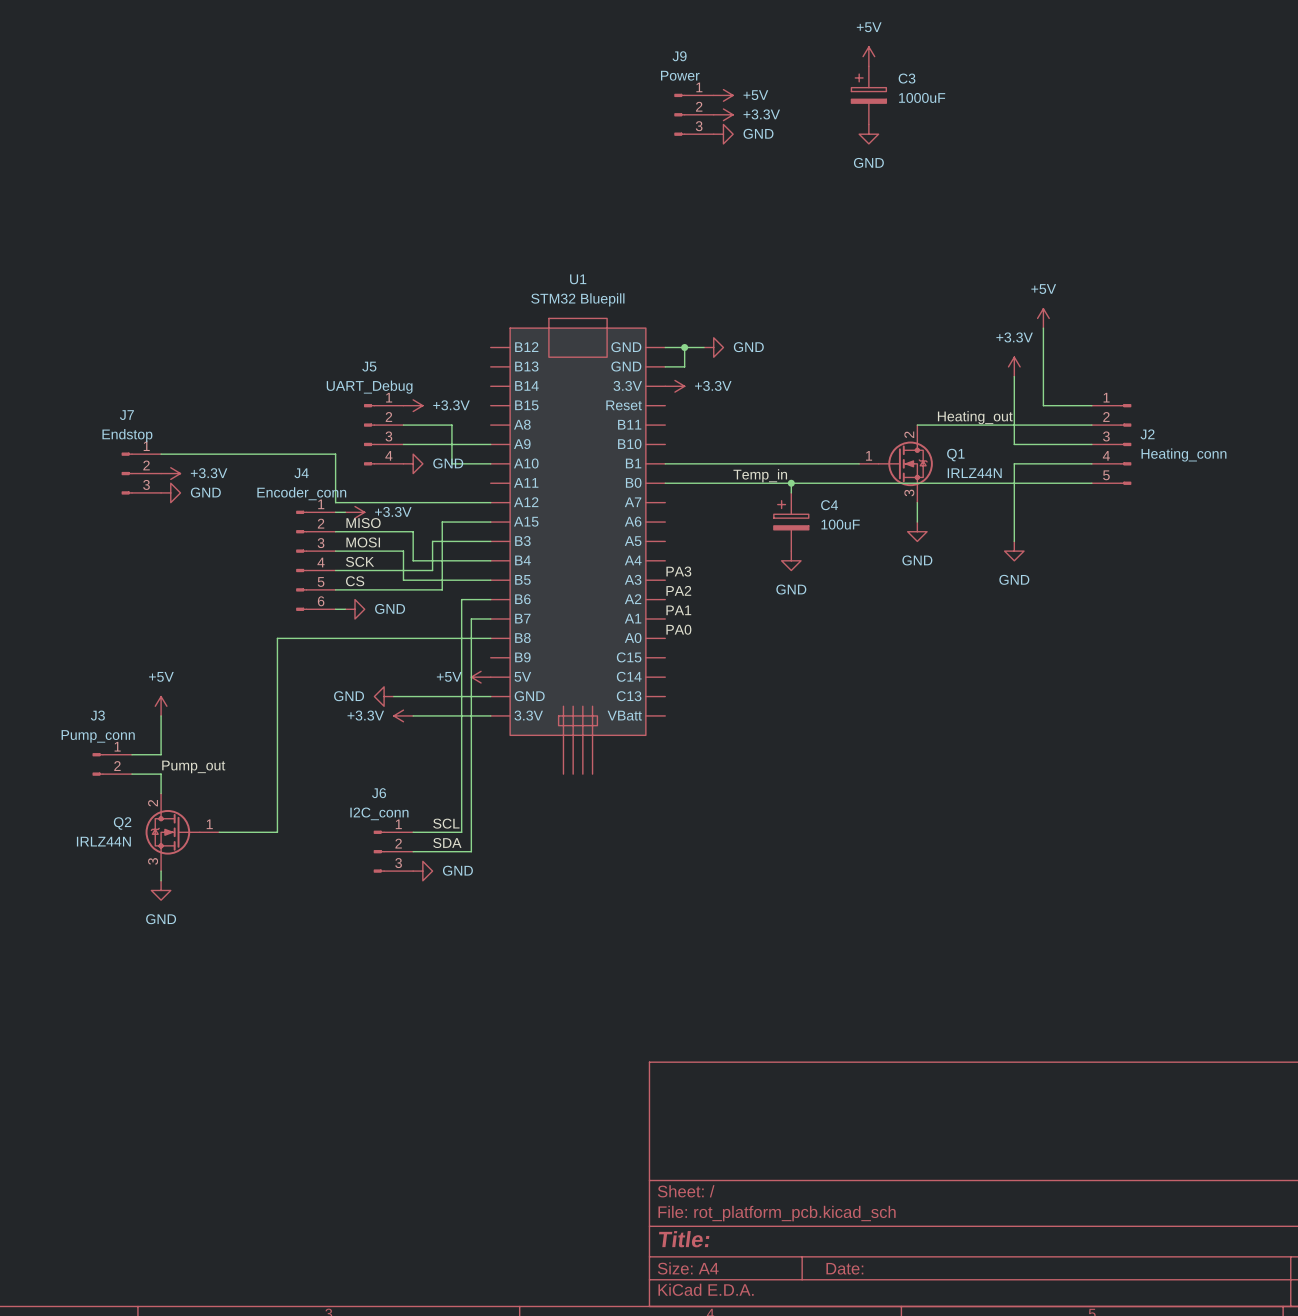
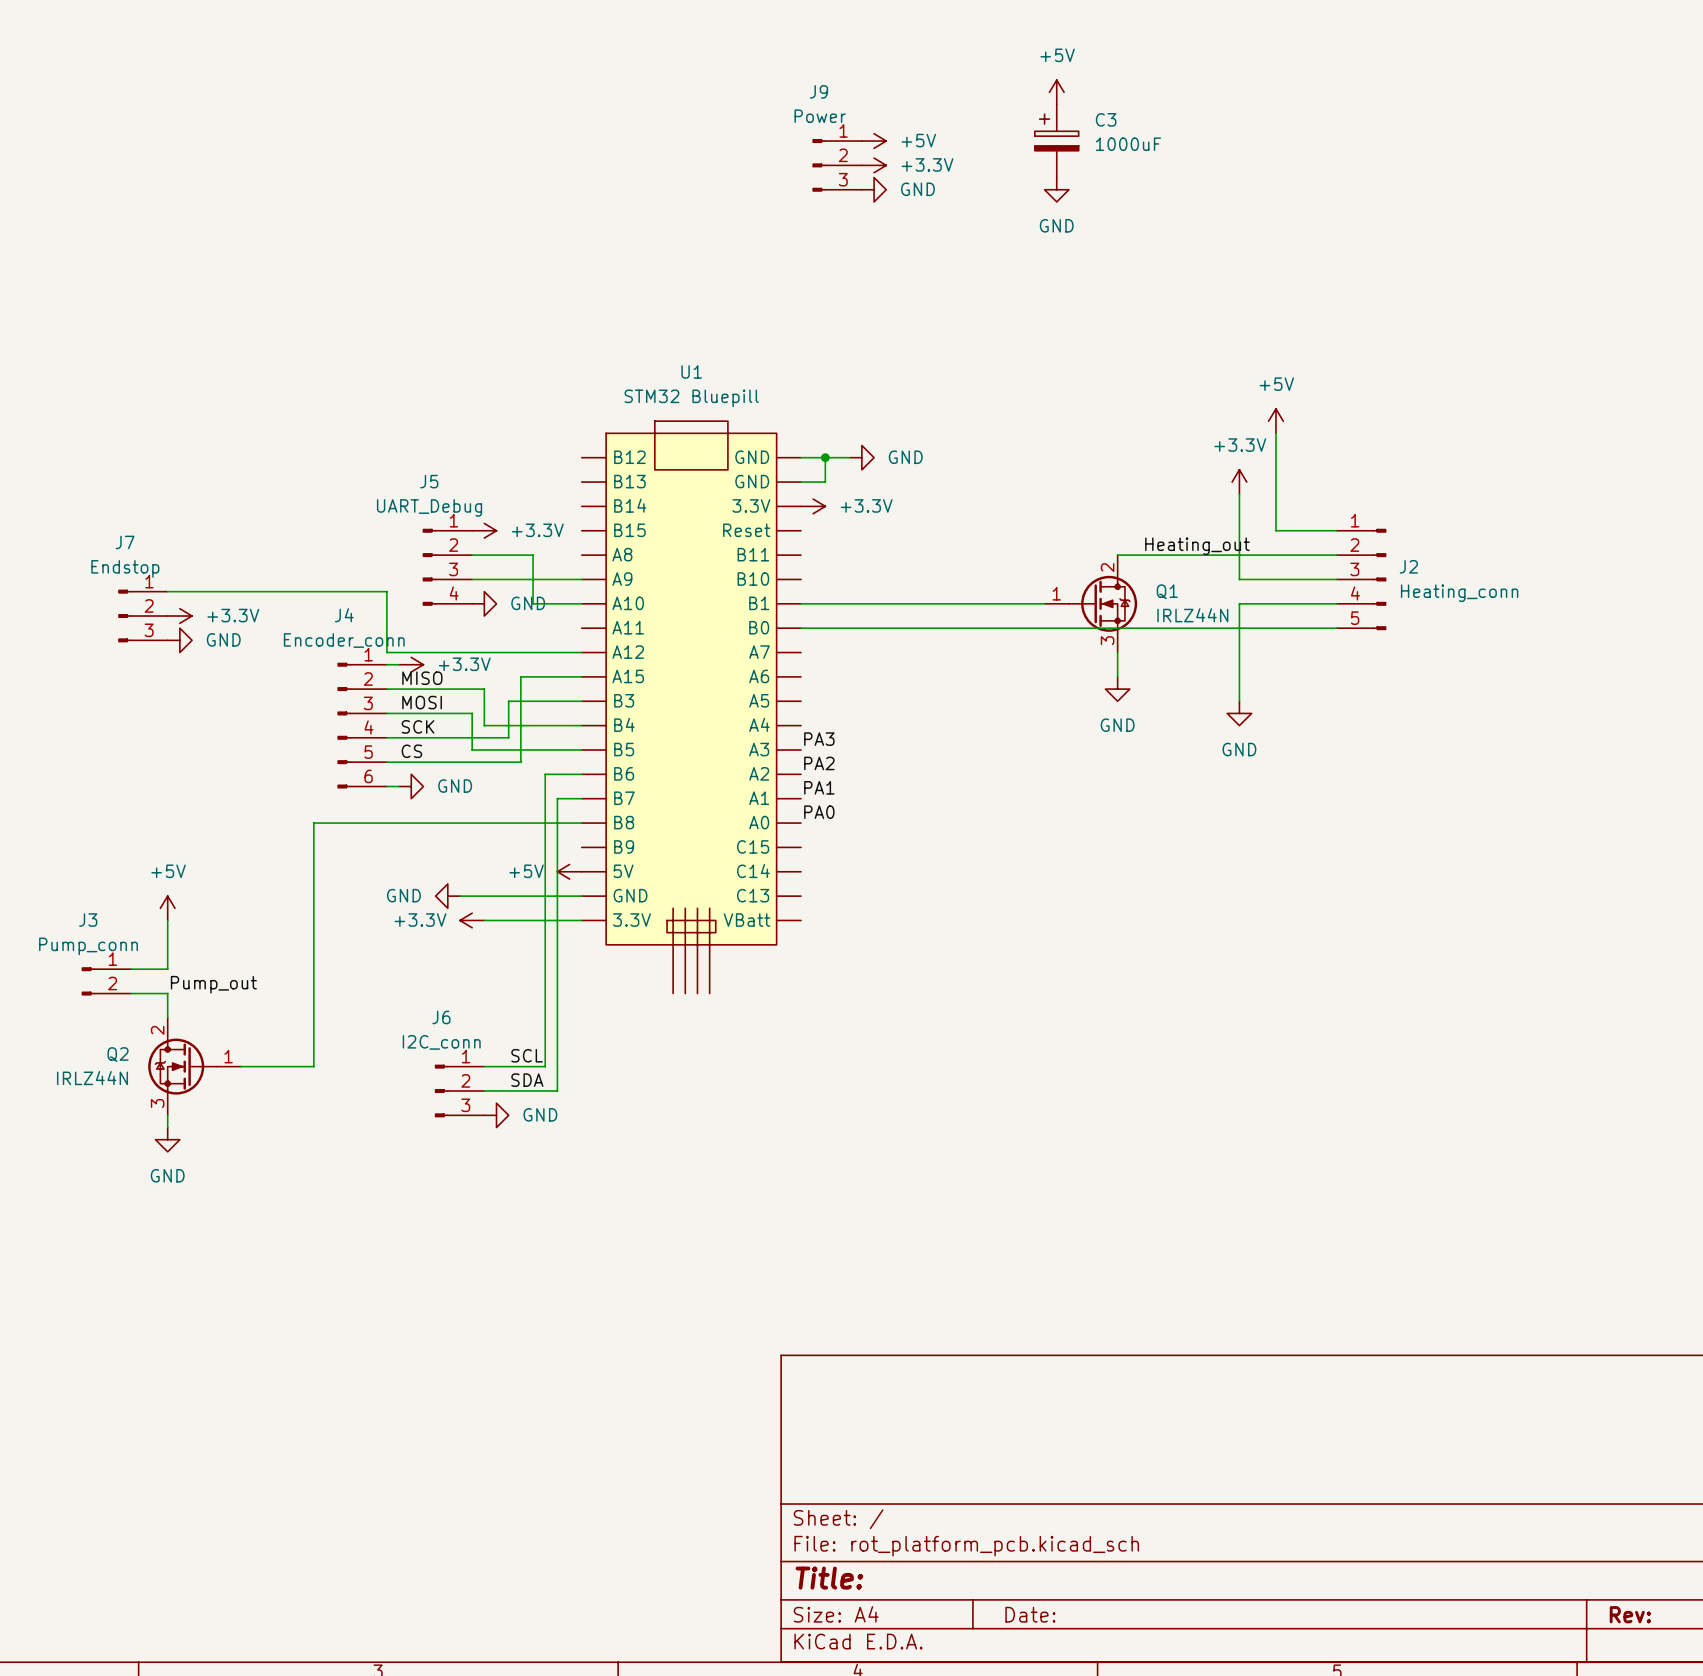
label: Temp_in (760, 475) -> none
wire: (791, 483) (791, 492) -> none
junction: (791, 483) -> none
C4: 100uF (791, 522) -> none
power symbol: GND (791, 560) -> none

